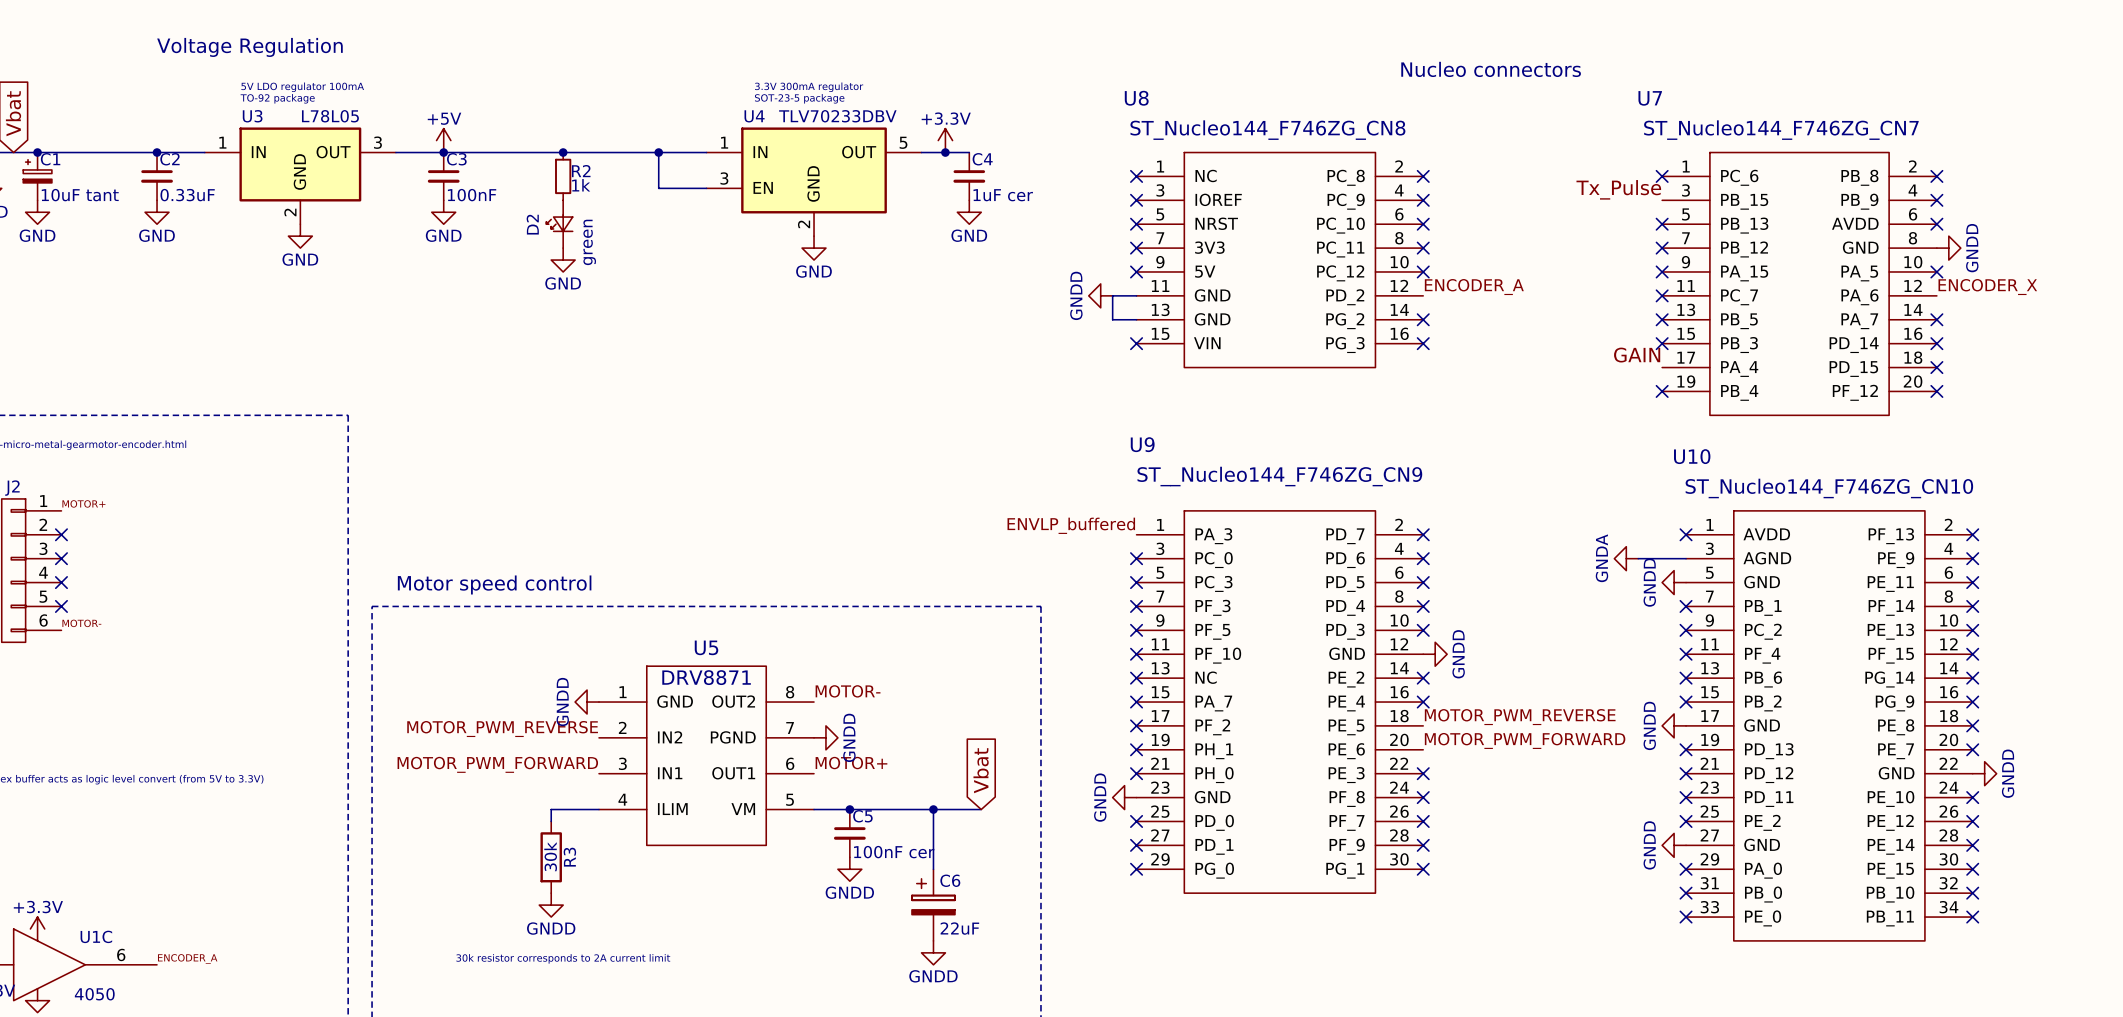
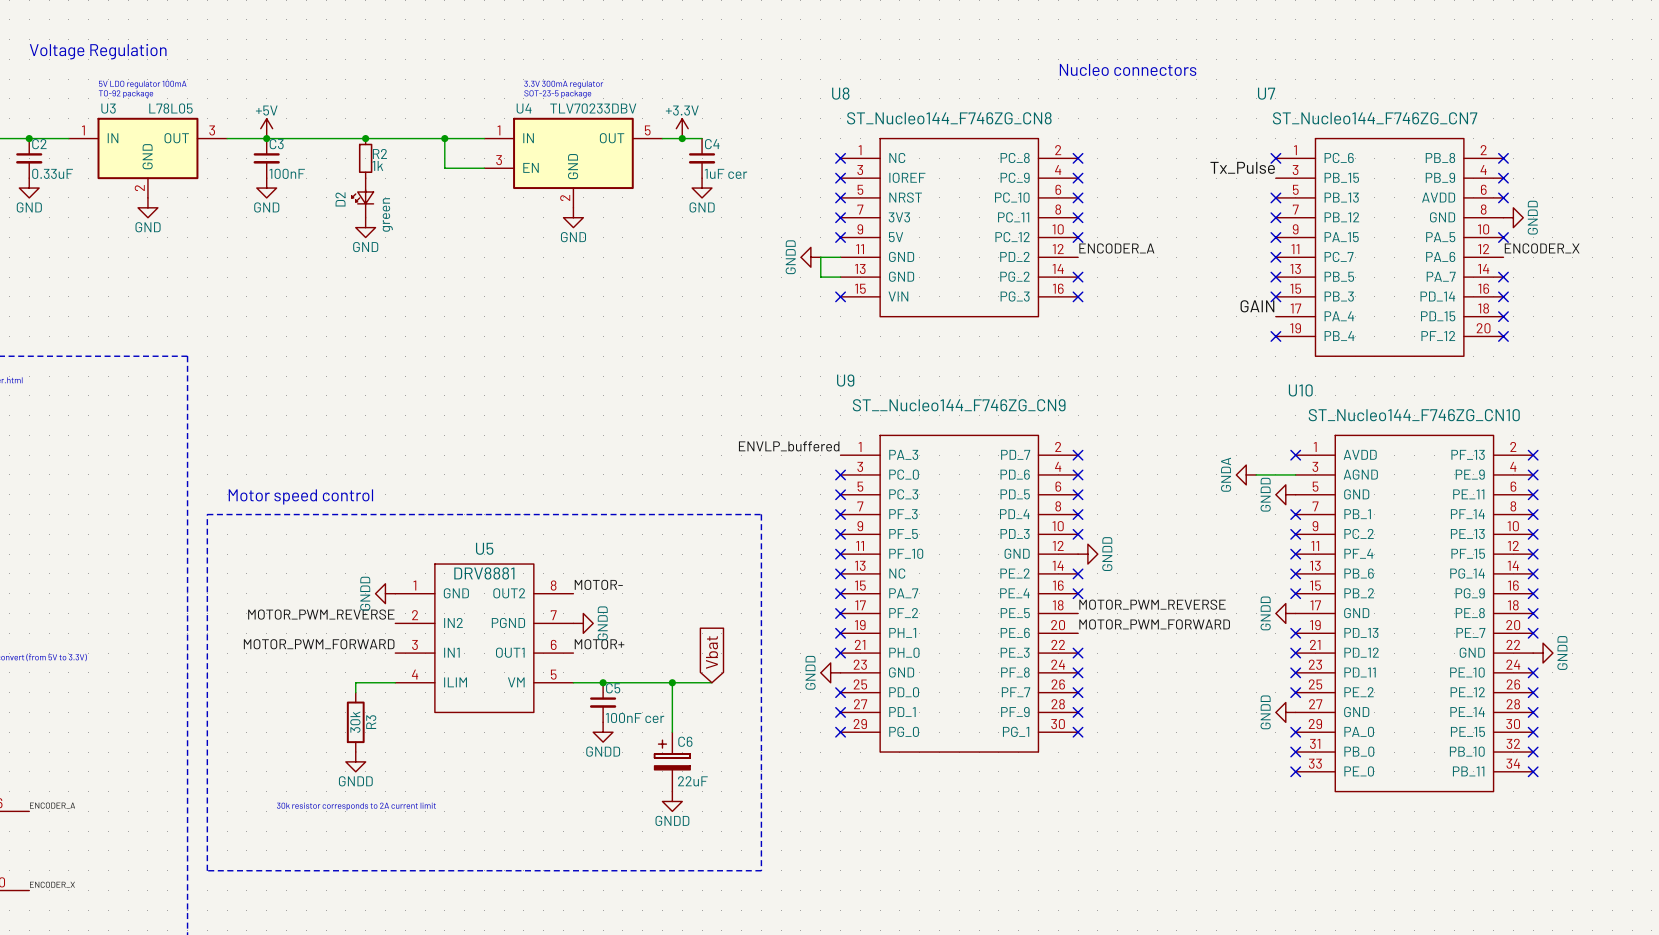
U5 value: DRV8871 (706, 677) -> DRV8881 (484, 573)

